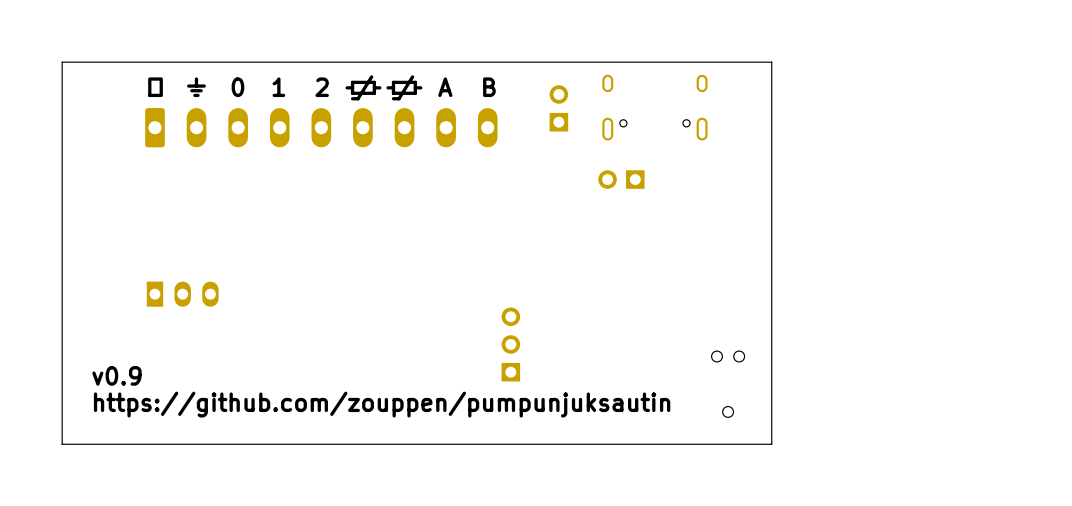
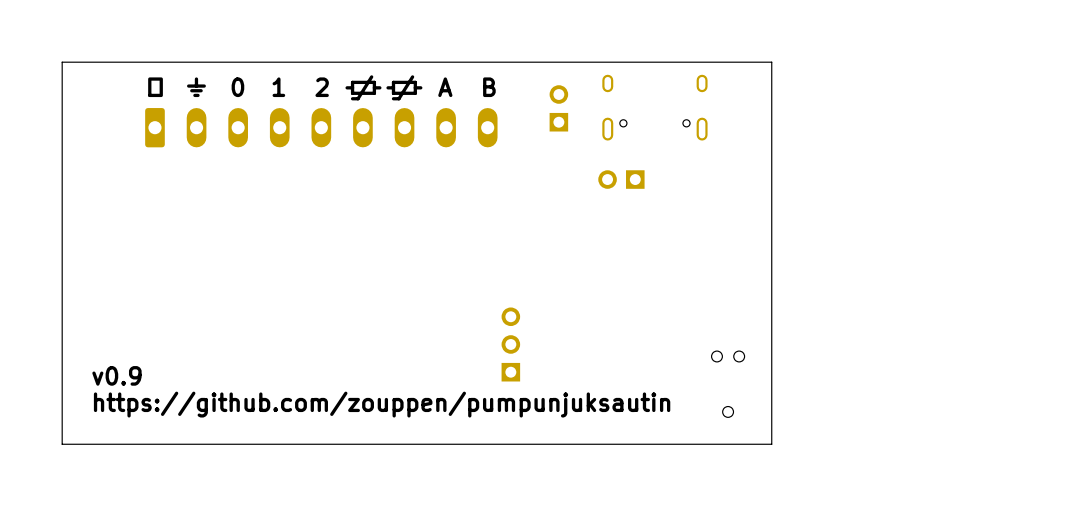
part: (182, 294) -> none

